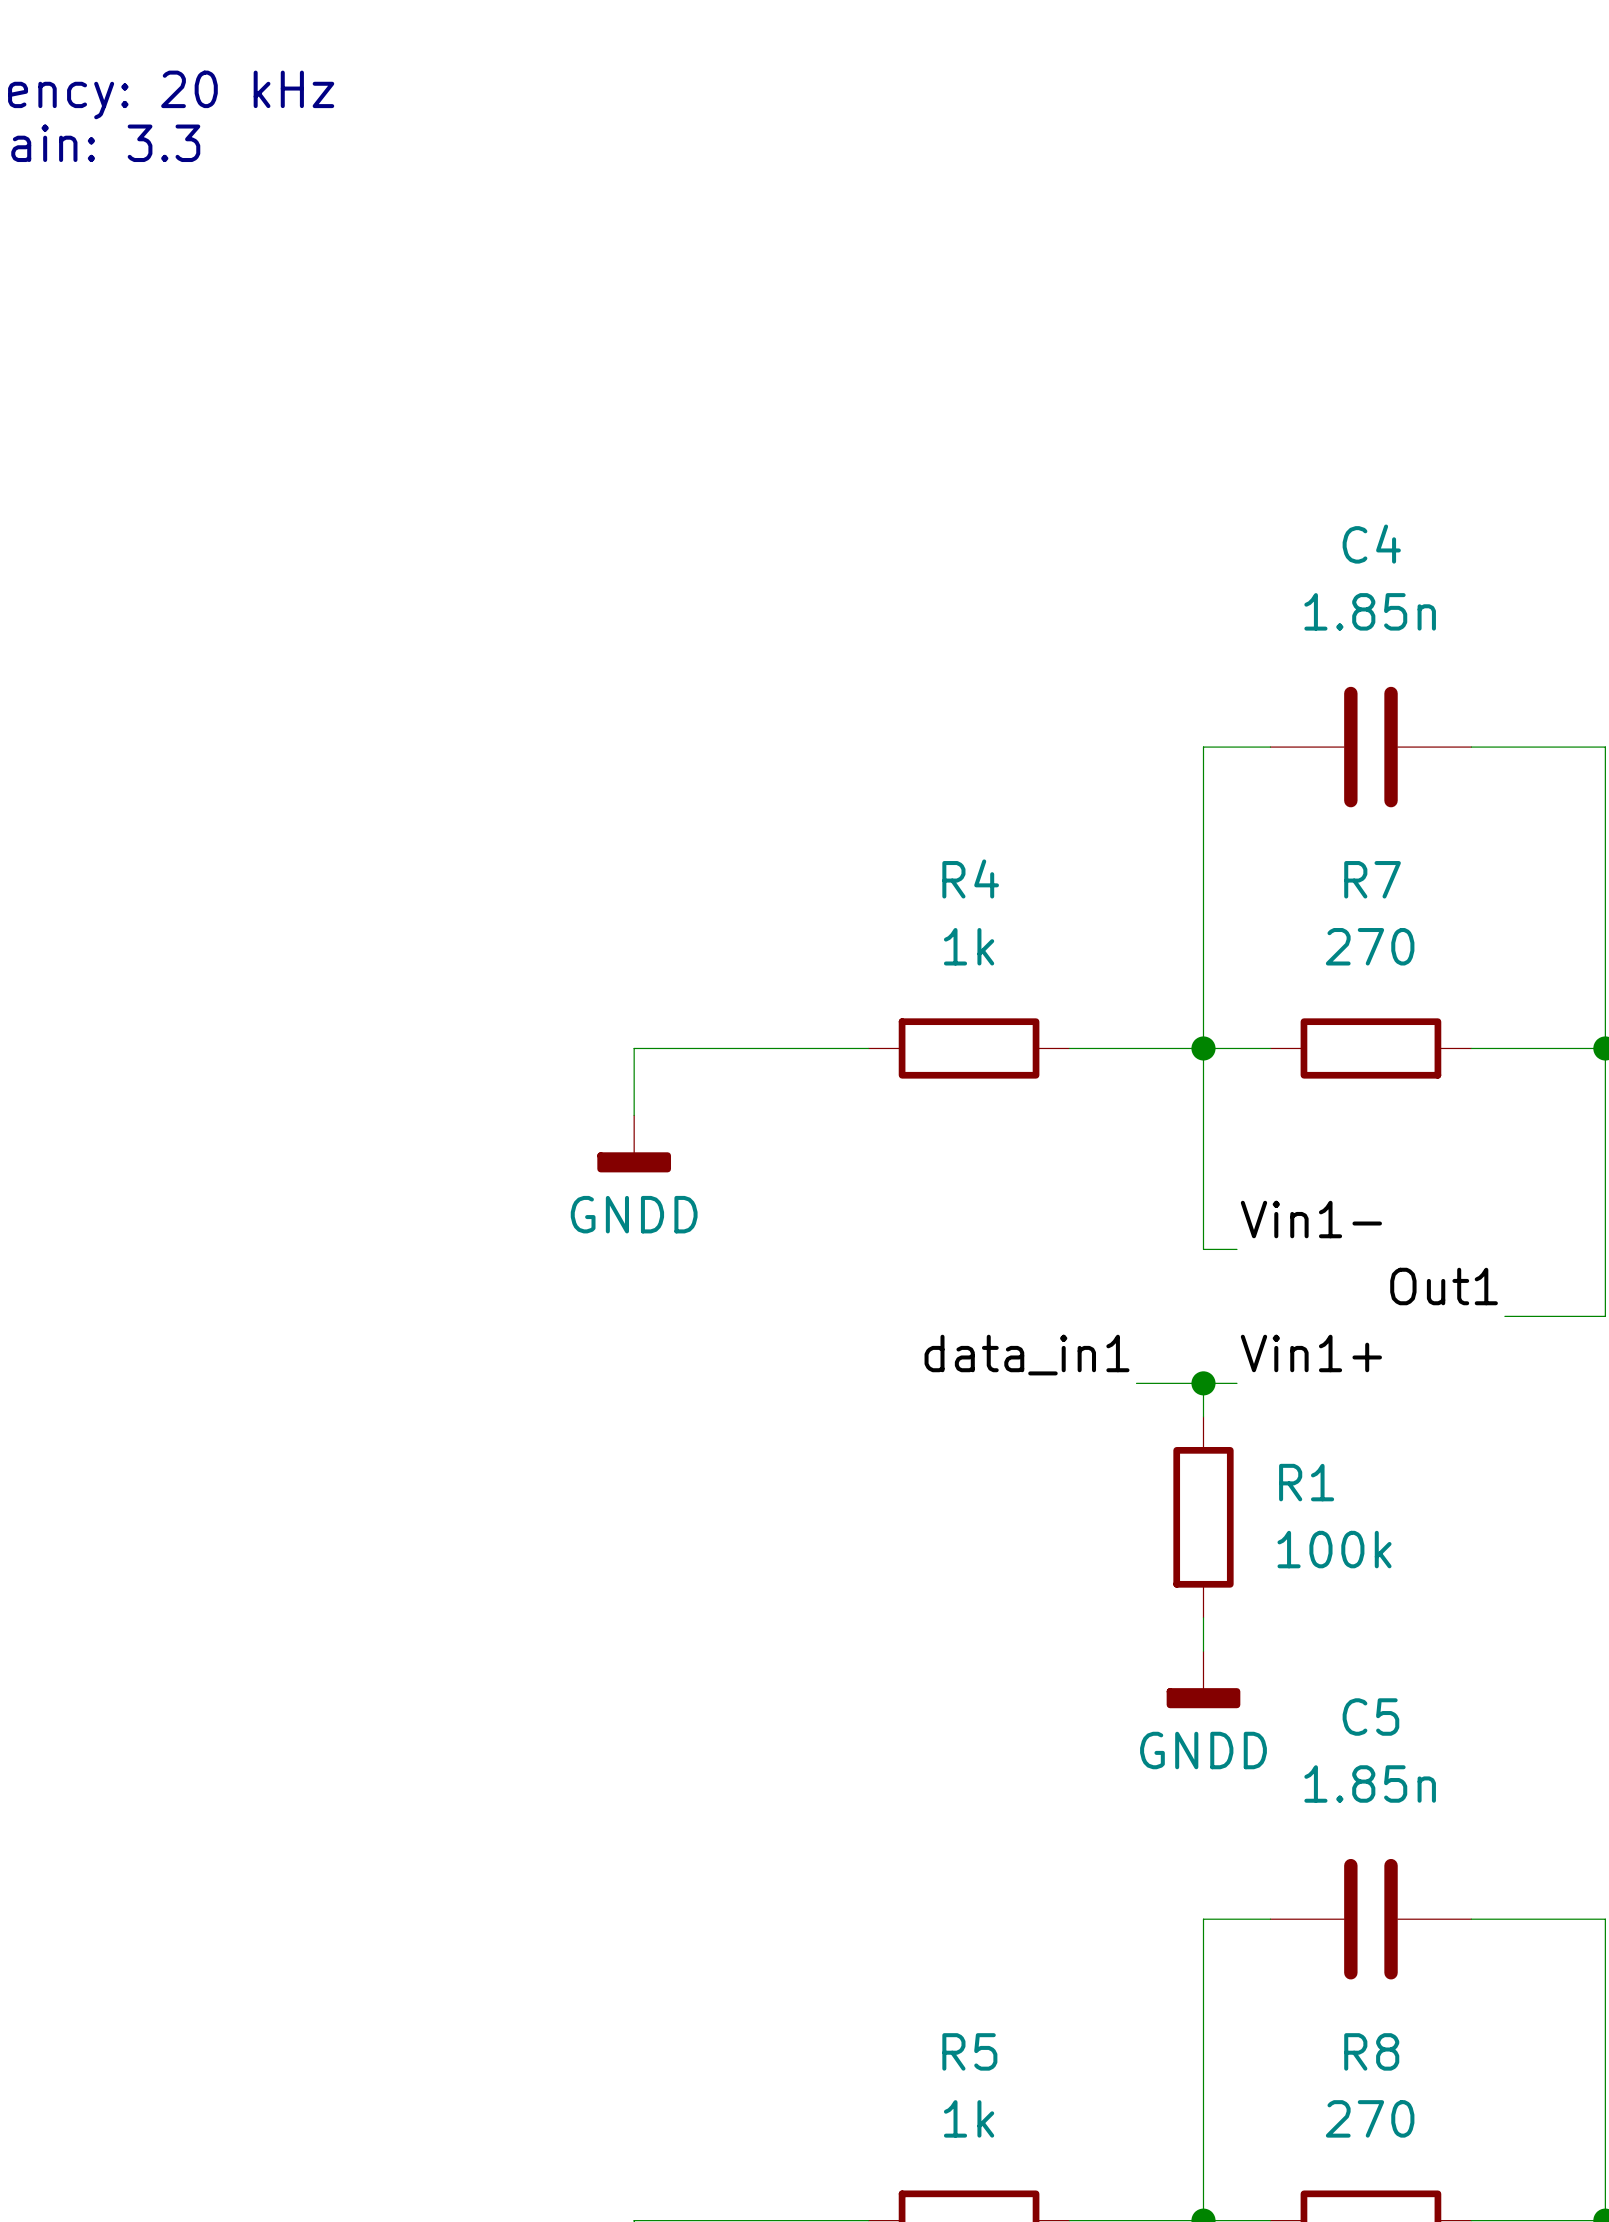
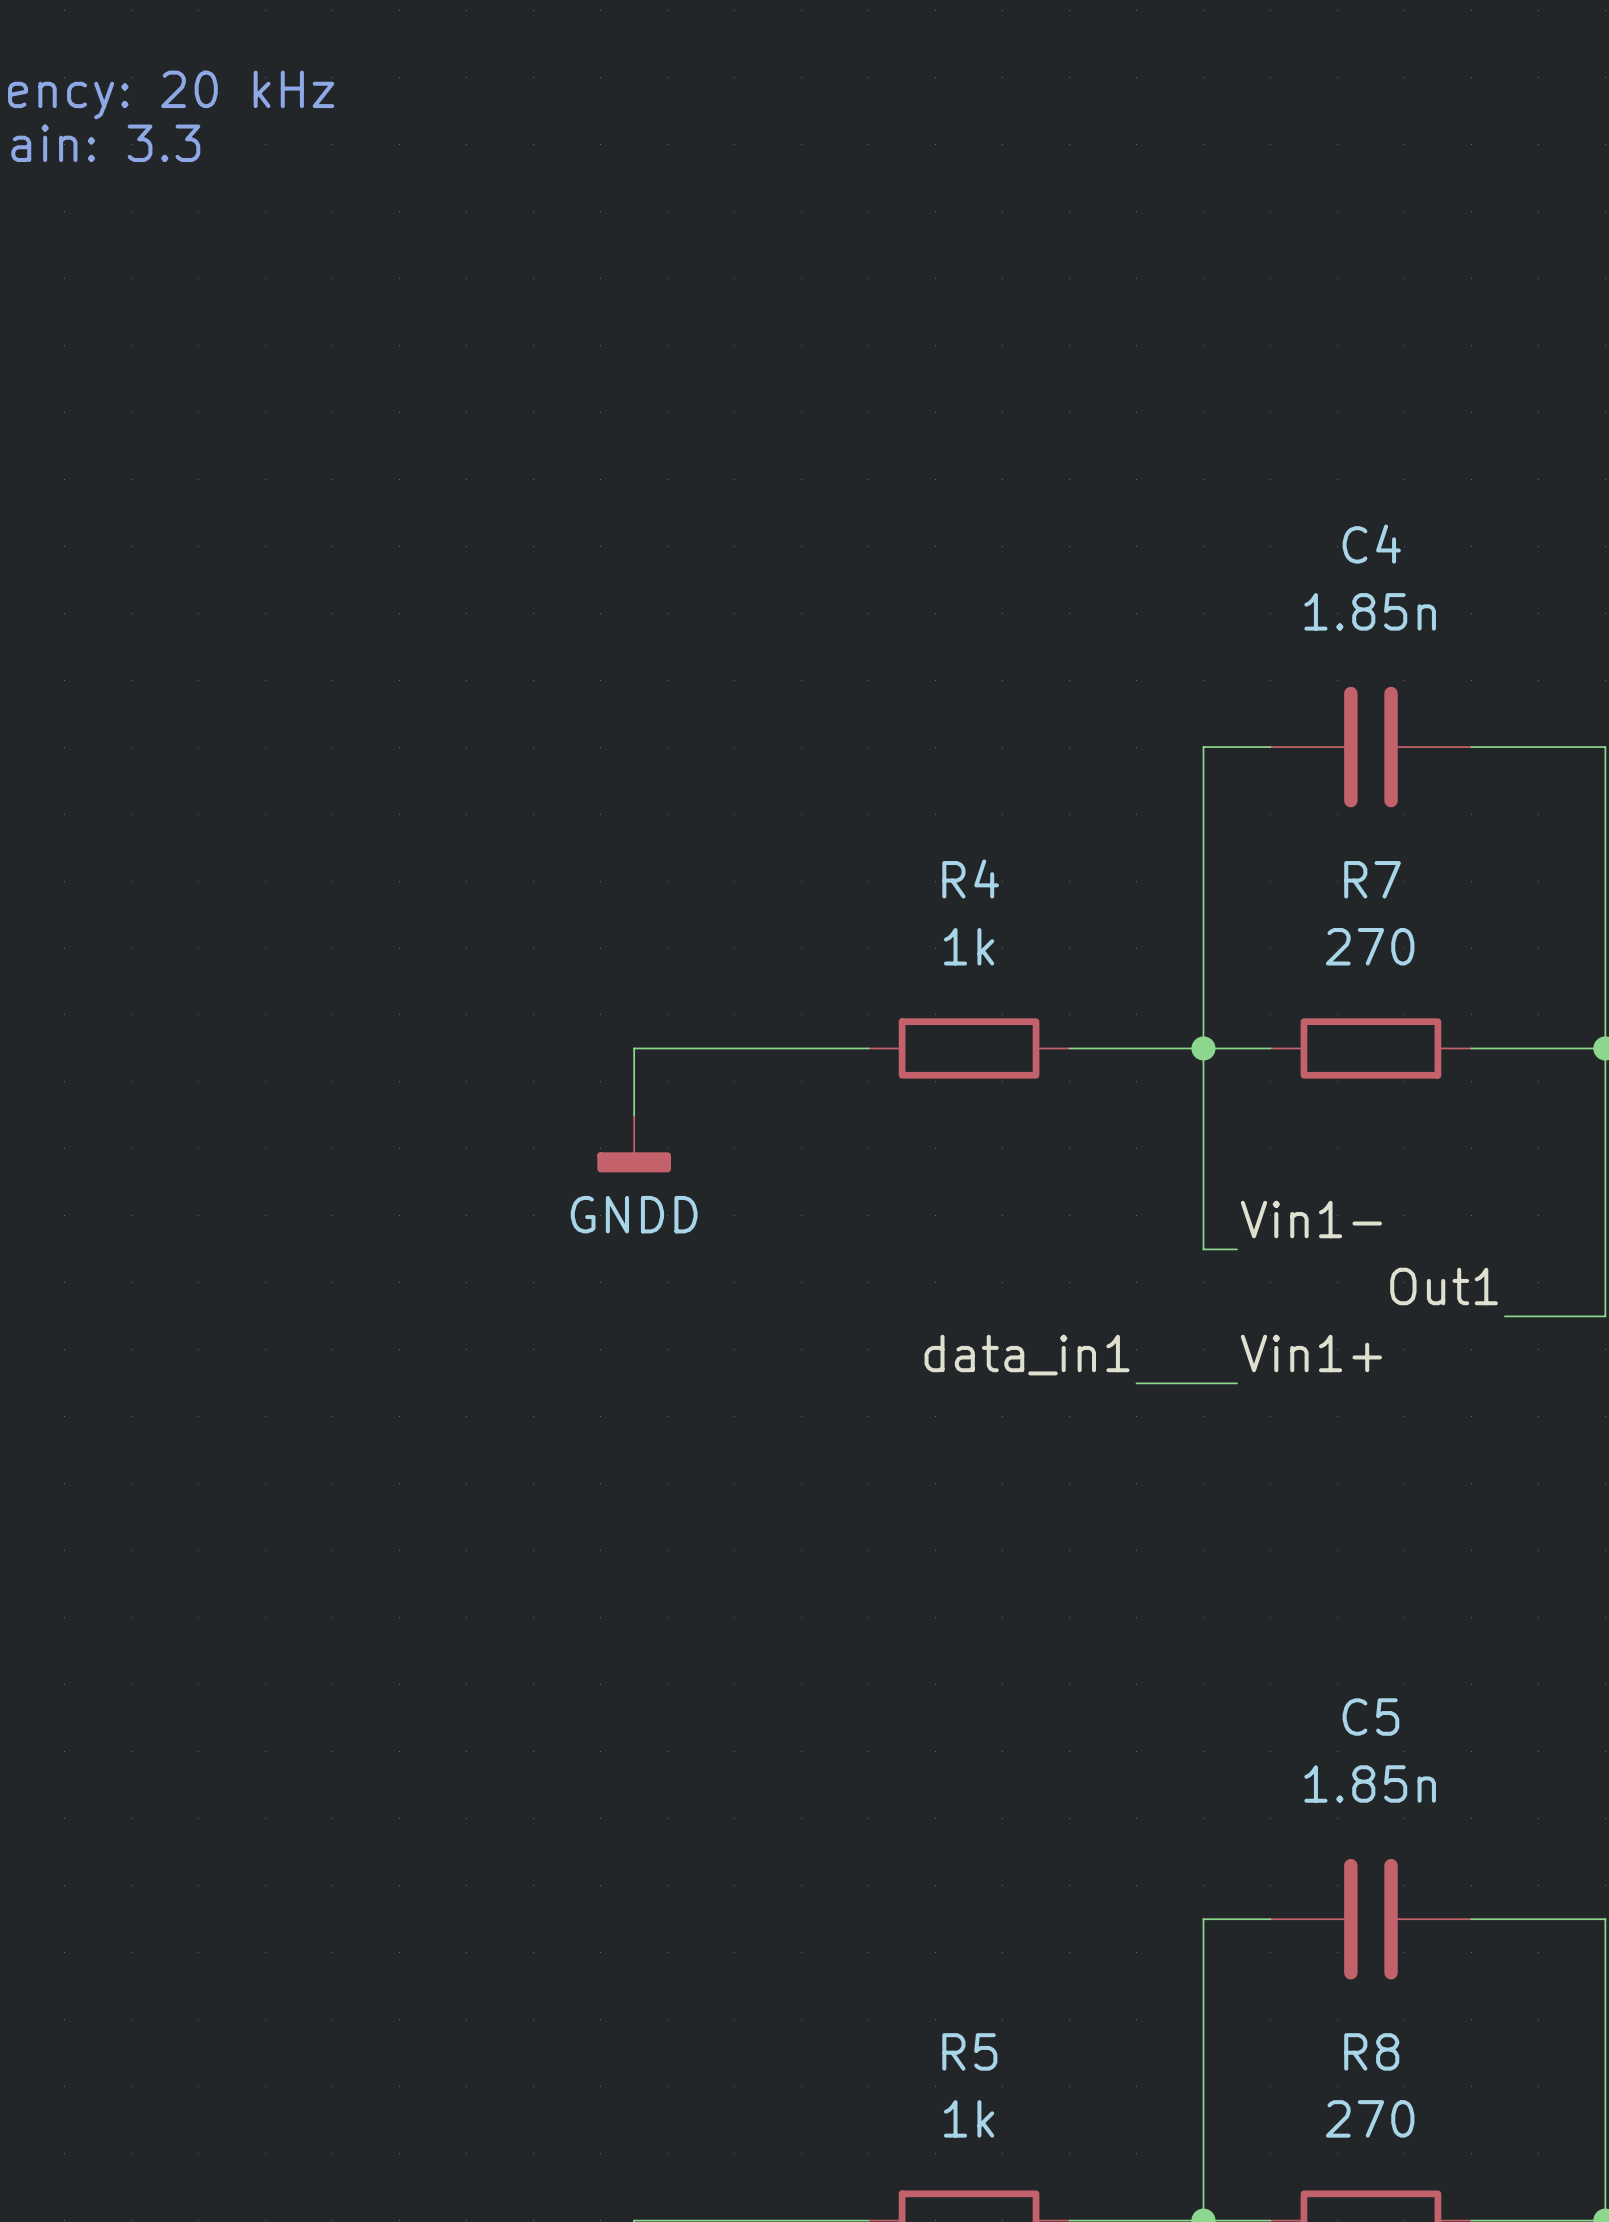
wire: (1203, 1383) (1203, 1416) -> none
junction: (1203, 1383) -> none
R1: 100k (1203, 1517) -> none
wire: (1203, 1617) (1203, 1651) -> none
power symbol: GNDD (1203, 1679) -> none

